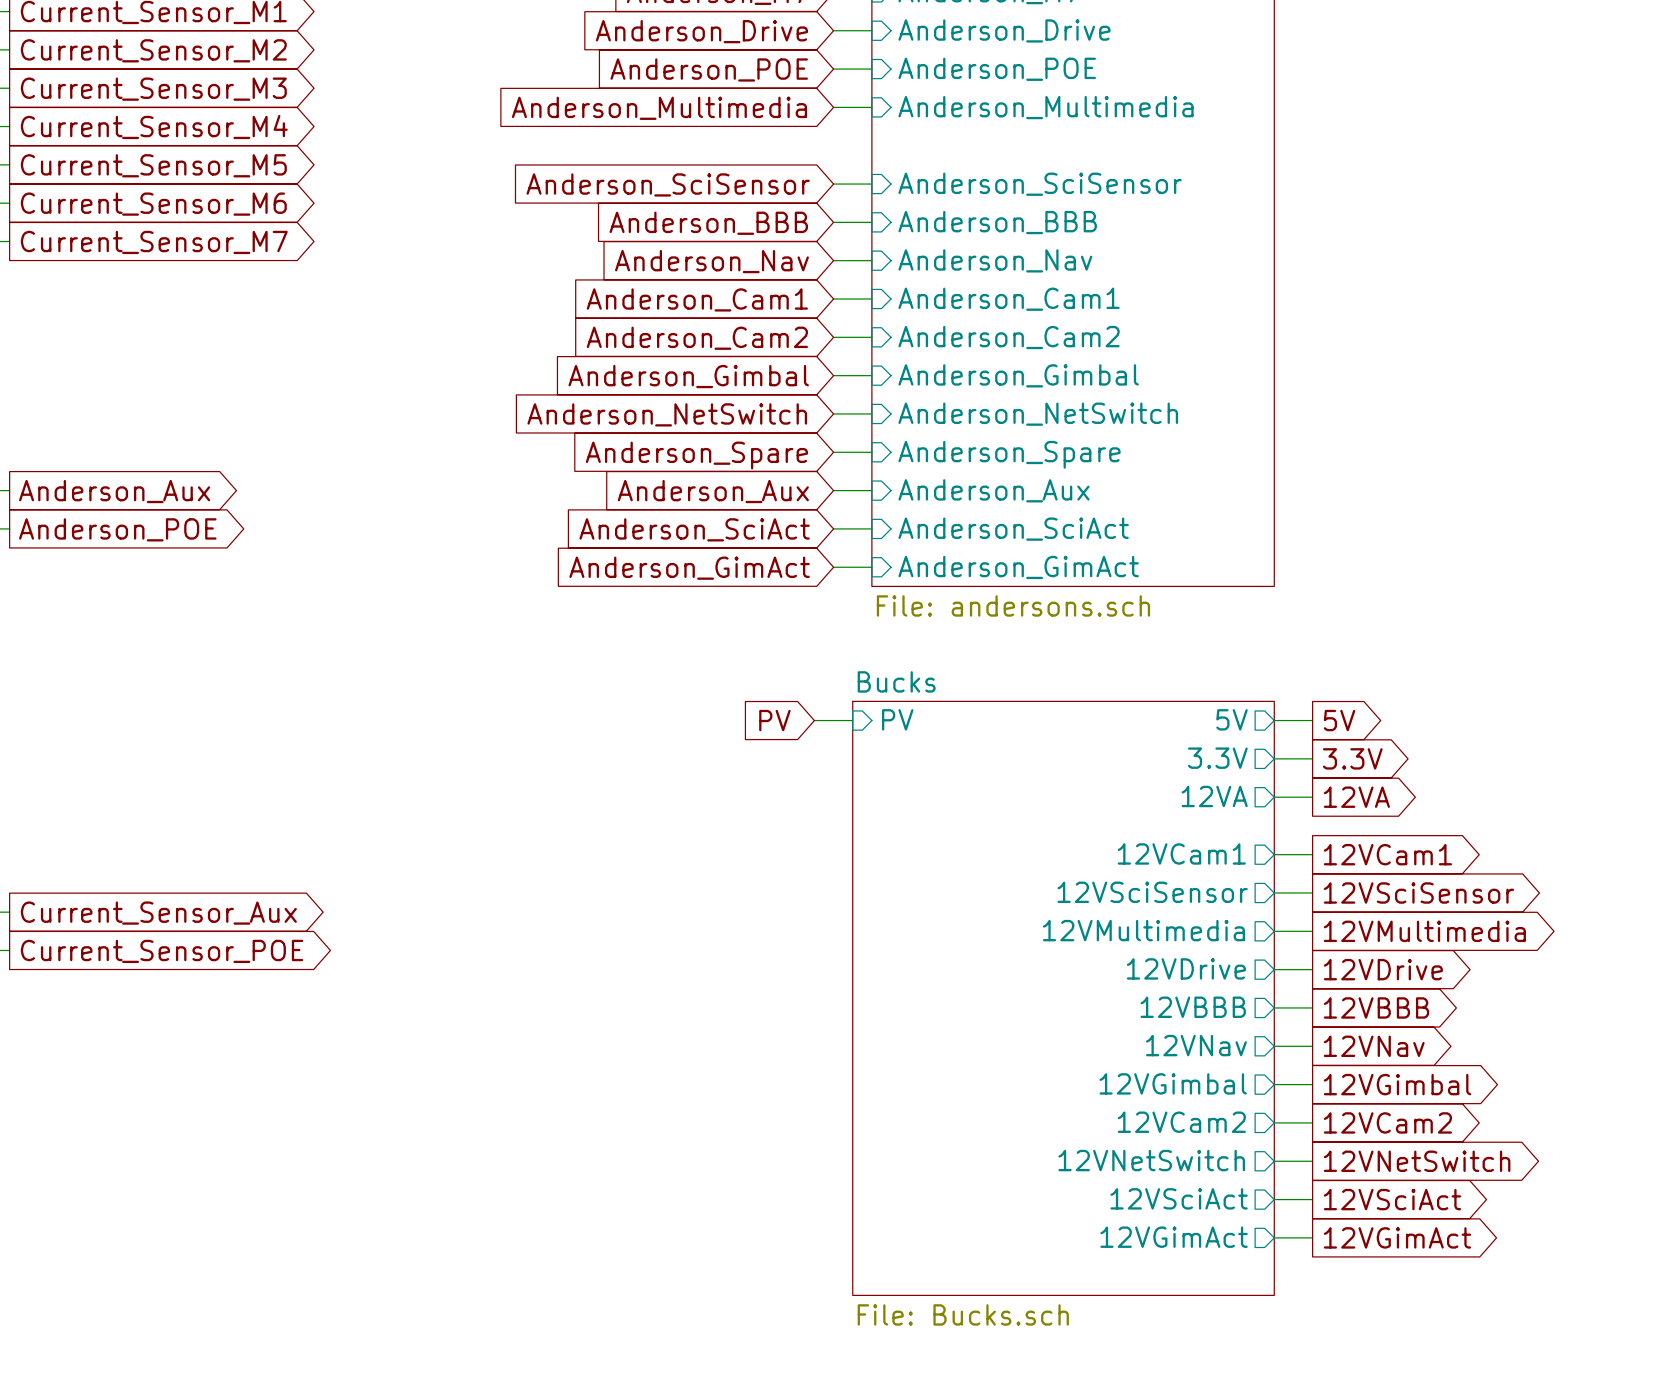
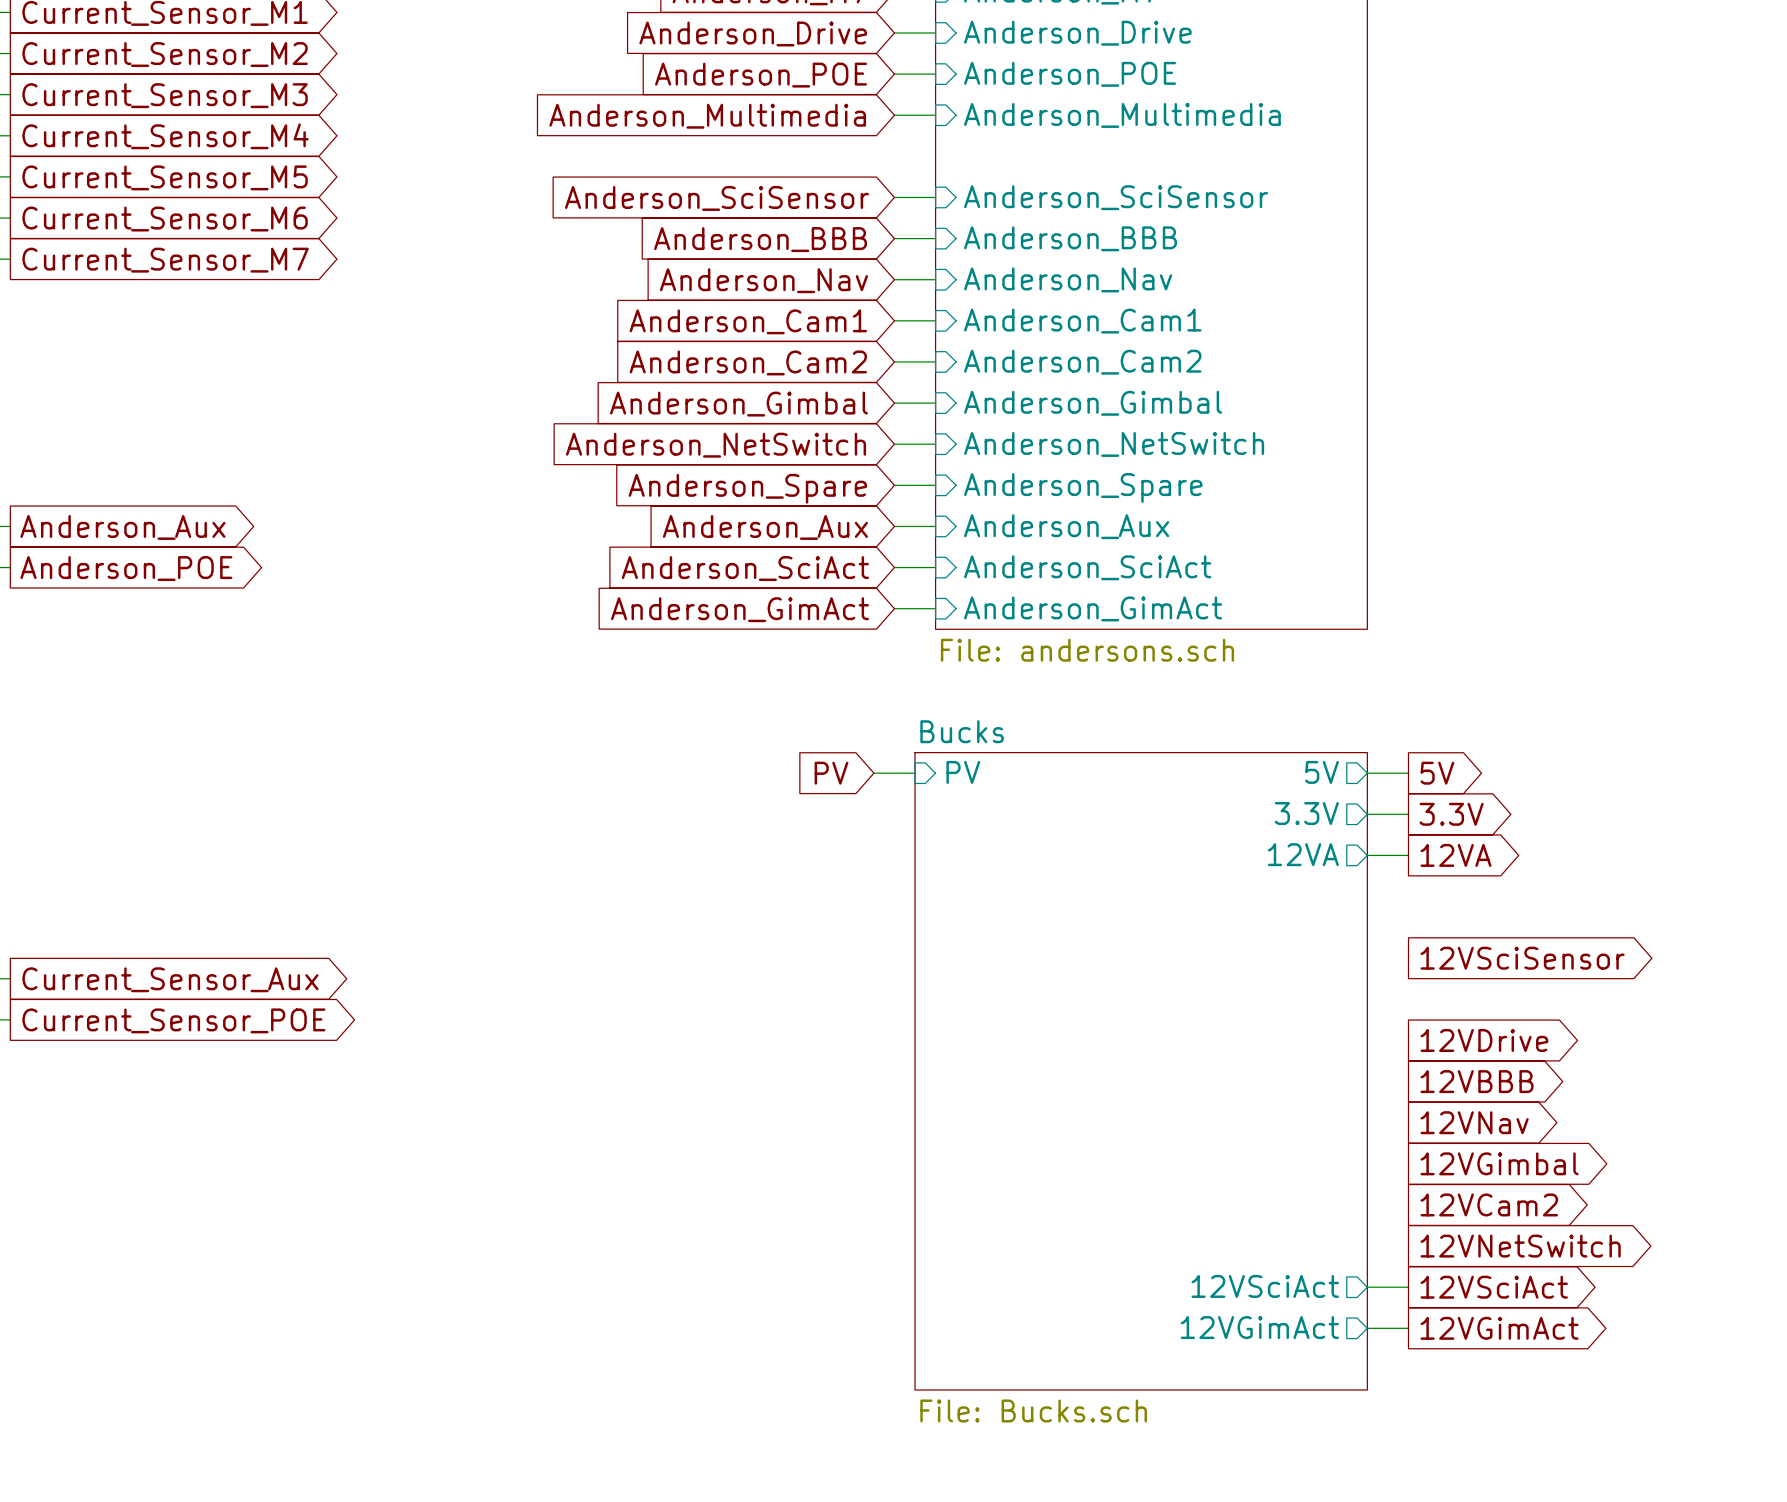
sheet pin: 12VCam1 (1181, 853) -> none
wire: (1274, 854) (1312, 854) -> none
global label: 12VCam1 (1387, 854) -> none
sheet pin: 12VSciSensor (1152, 892) -> none
wire: (1274, 893) (1312, 893) -> none
sheet pin: 12VMultimedia (1143, 930) -> none
wire: (1274, 931) (1312, 931) -> none
global label: 12VMultimedia (1424, 931) -> none
sheet pin: 12VDrive (1186, 968) -> none
wire: (1274, 969) (1312, 969) -> none
sheet pin: 12VBBB (1193, 1007) -> none
wire: (1274, 1007) (1312, 1007) -> none
sheet pin: 12VNav (1196, 1045) -> none
wire: (1274, 1046) (1312, 1046) -> none
sheet pin: 12VGimbal (1173, 1083) -> none
wire: (1274, 1084) (1312, 1084) -> none
sheet pin: 12VCam2 (1181, 1122) -> none
wire: (1274, 1122) (1312, 1122) -> none
sheet pin: 12VNetSwitch (1151, 1160) -> none
wire: (1274, 1161) (1312, 1161) -> none

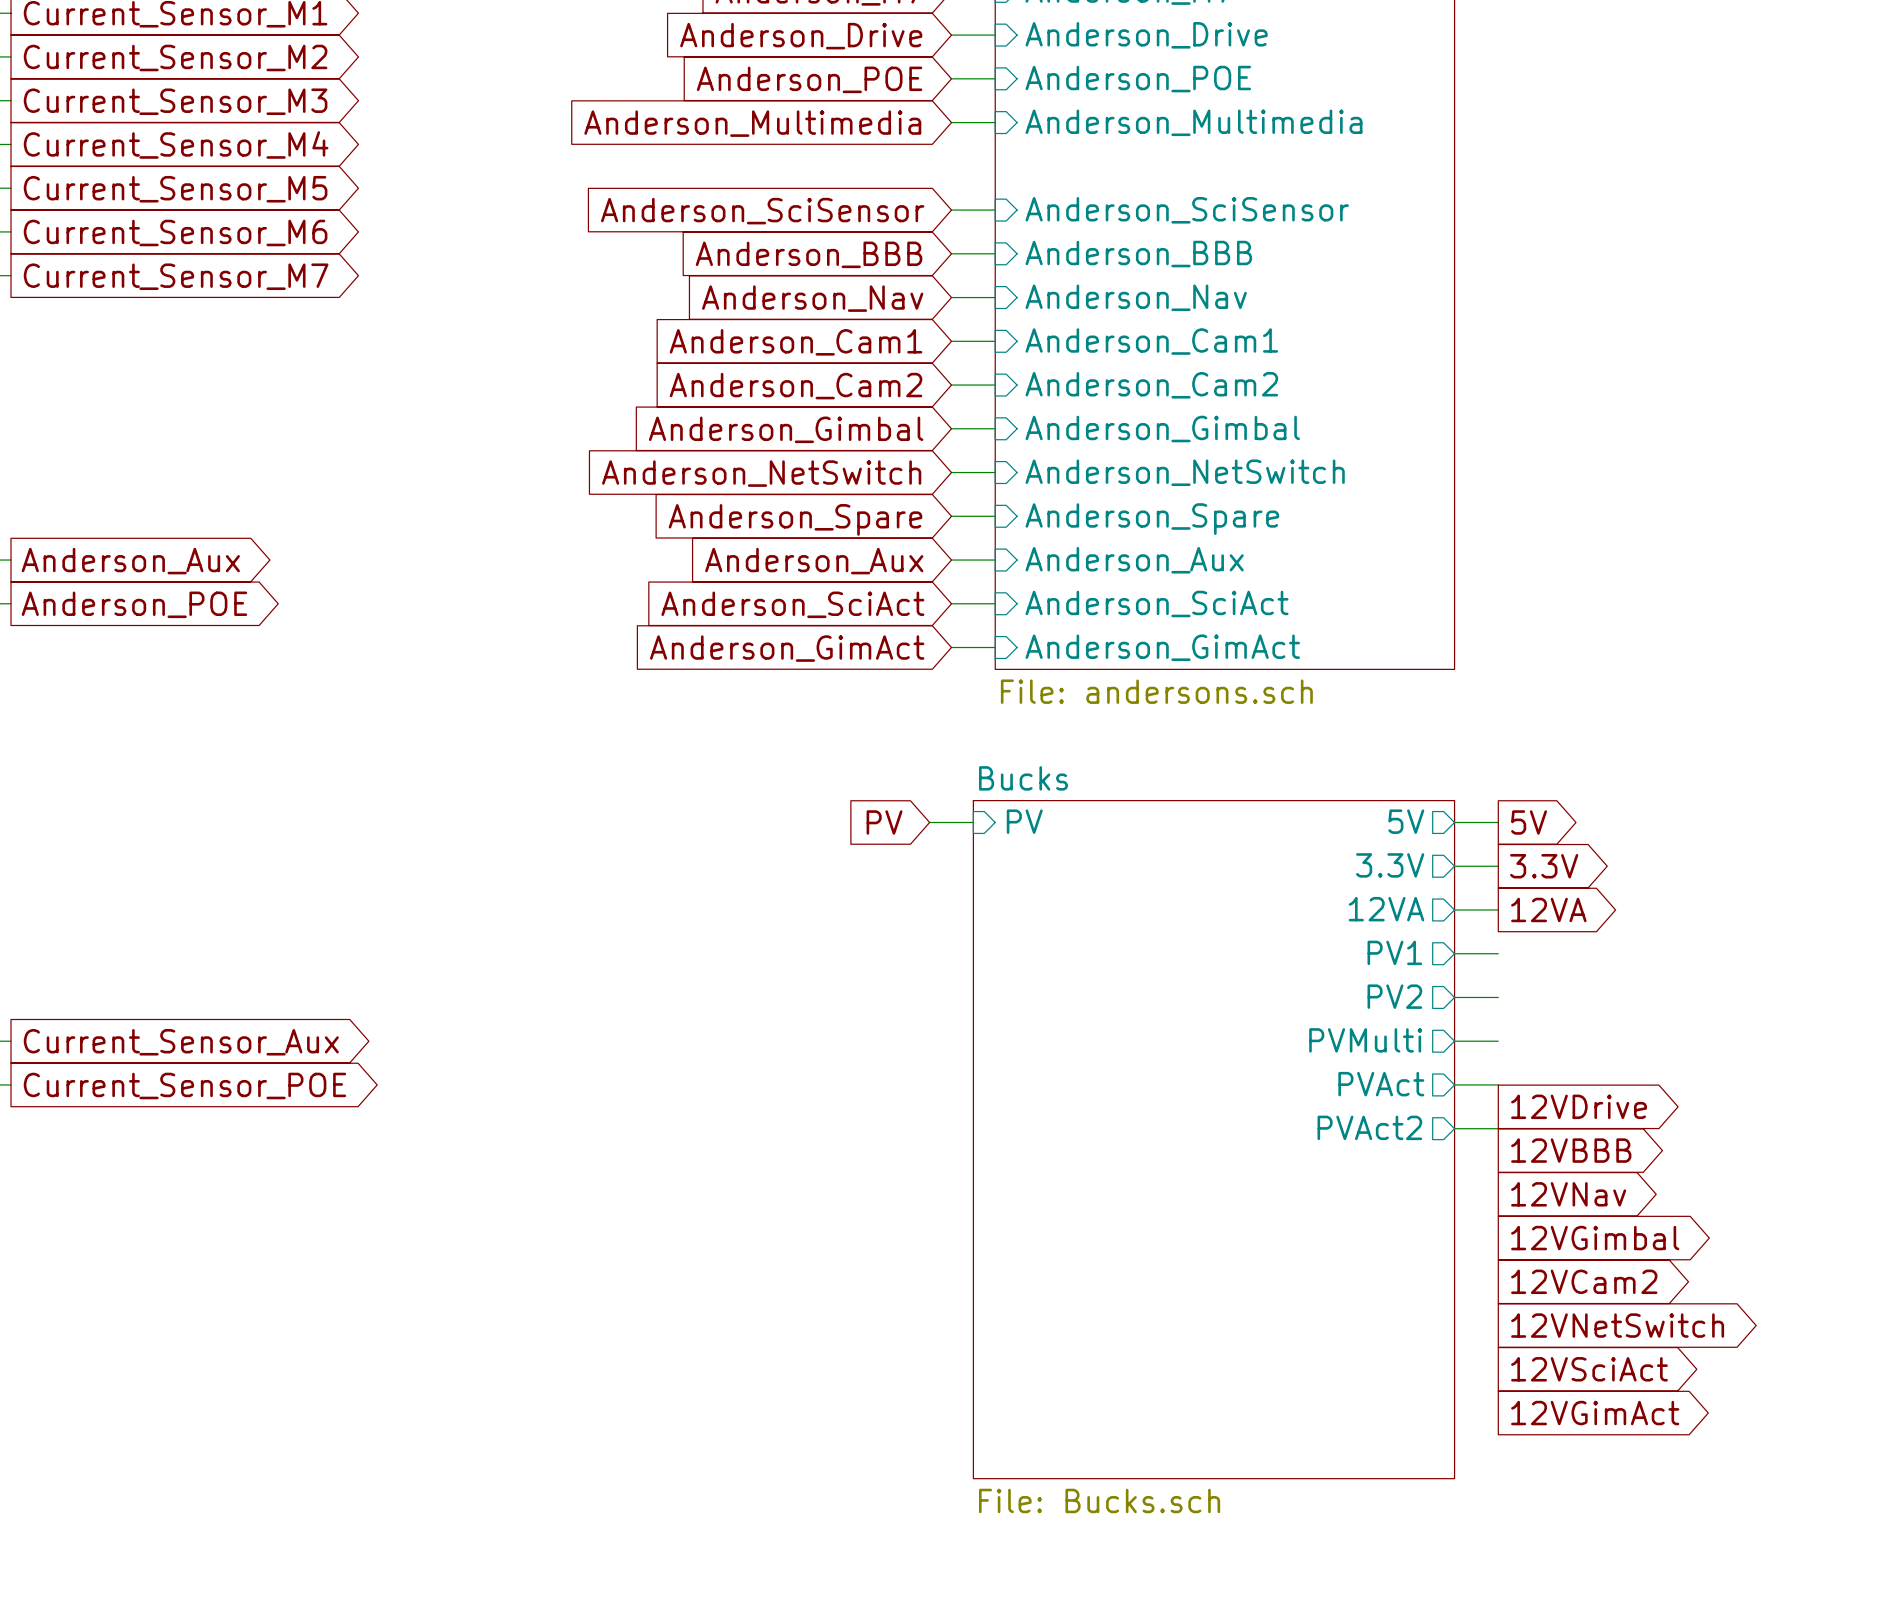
sheet pin: none -> PV1 (1394, 952)
wire: none -> (1454, 953) (1498, 953)
sheet pin: none -> PV2 (1394, 996)
wire: none -> (1454, 997) (1498, 997)
global label: 12VSciSensor (1522, 958) -> none
sheet pin: none -> PVMulti (1365, 1040)
wire: none -> (1454, 1041) (1498, 1041)
sheet pin: none -> PVAct (1381, 1084)
sheet pin: none -> PVAct2 (1369, 1127)
sheet pin: 12VSciAct (1265, 1286) -> none
wire: (1367, 1287) (1408, 1287) -> (1454, 1084) (1498, 1084)
sheet pin: 12VGimAct (1259, 1327) -> none
wire: (1367, 1328) (1408, 1328) -> (1454, 1128) (1498, 1128)

